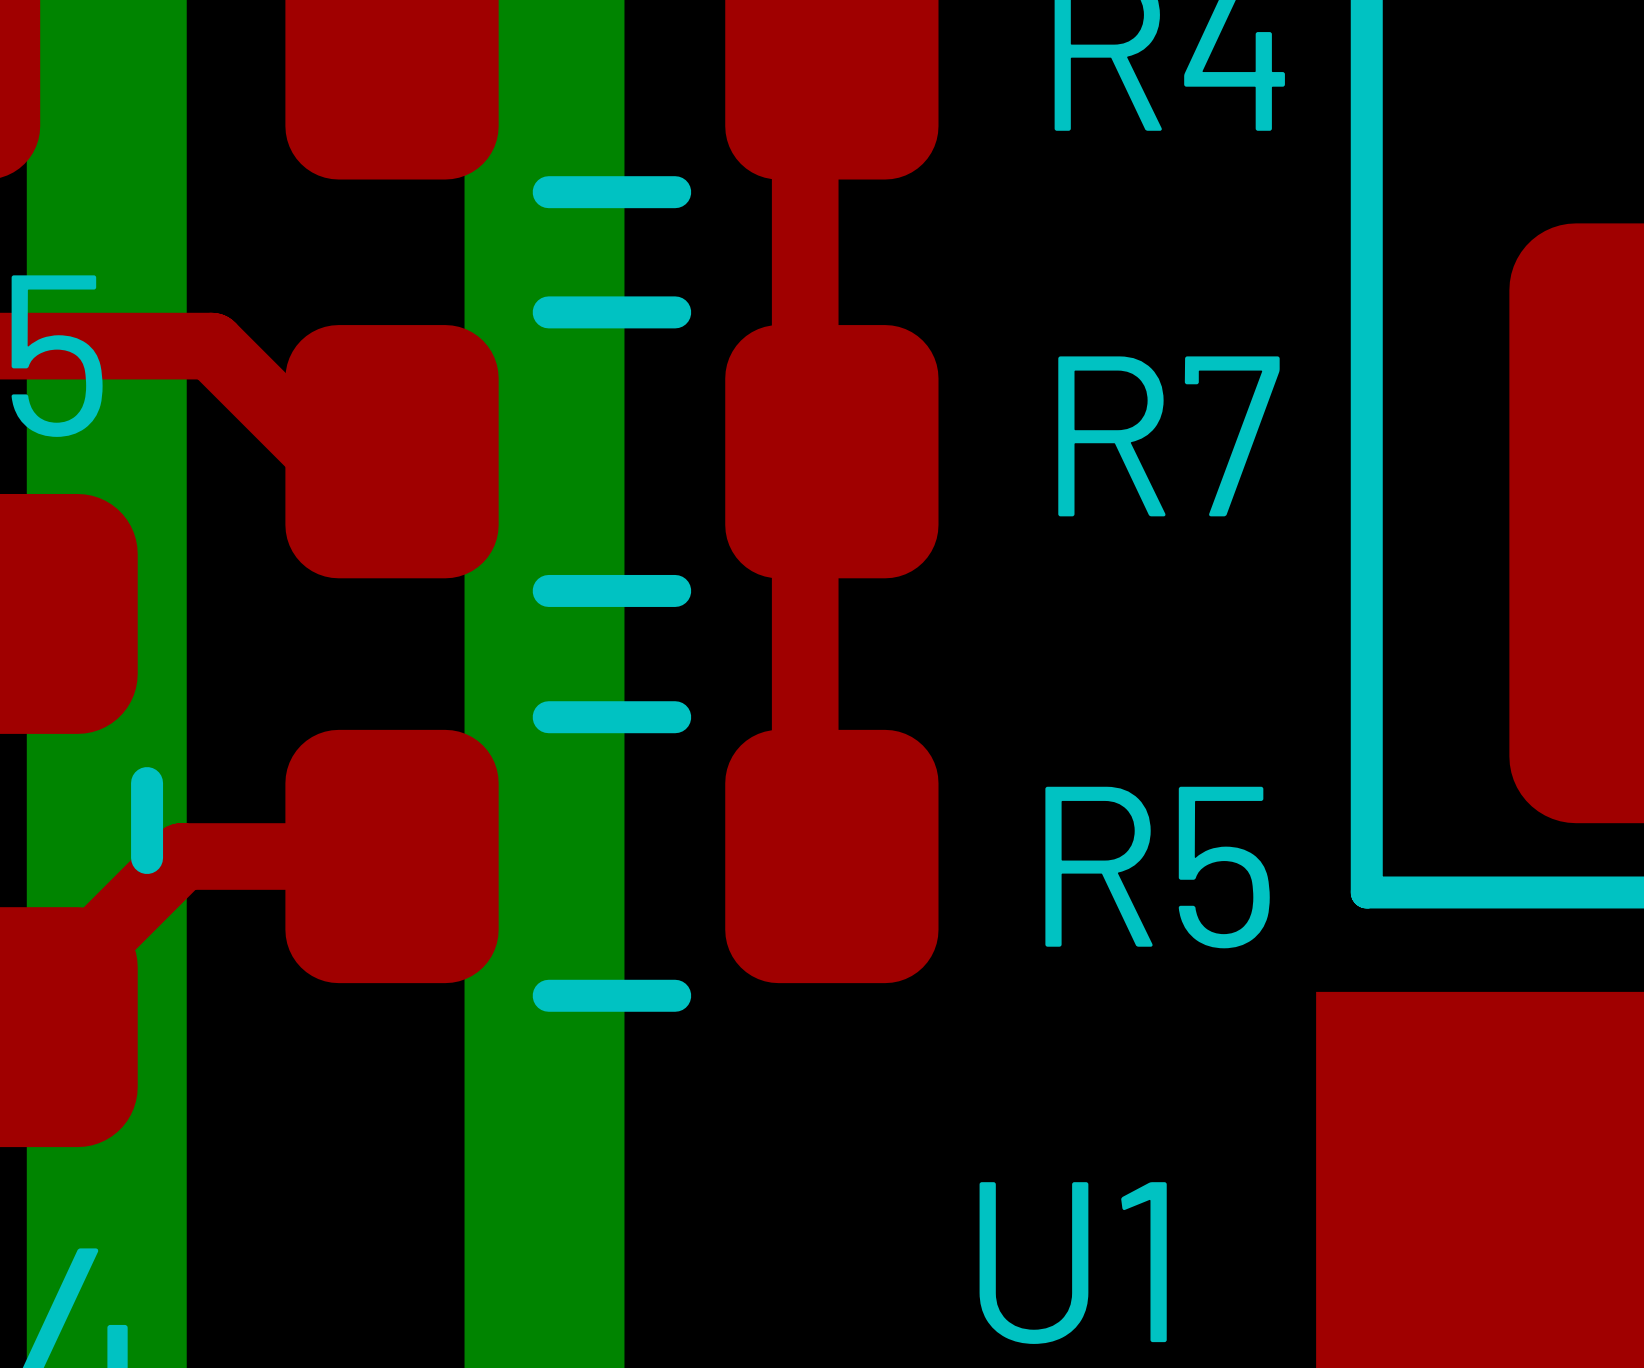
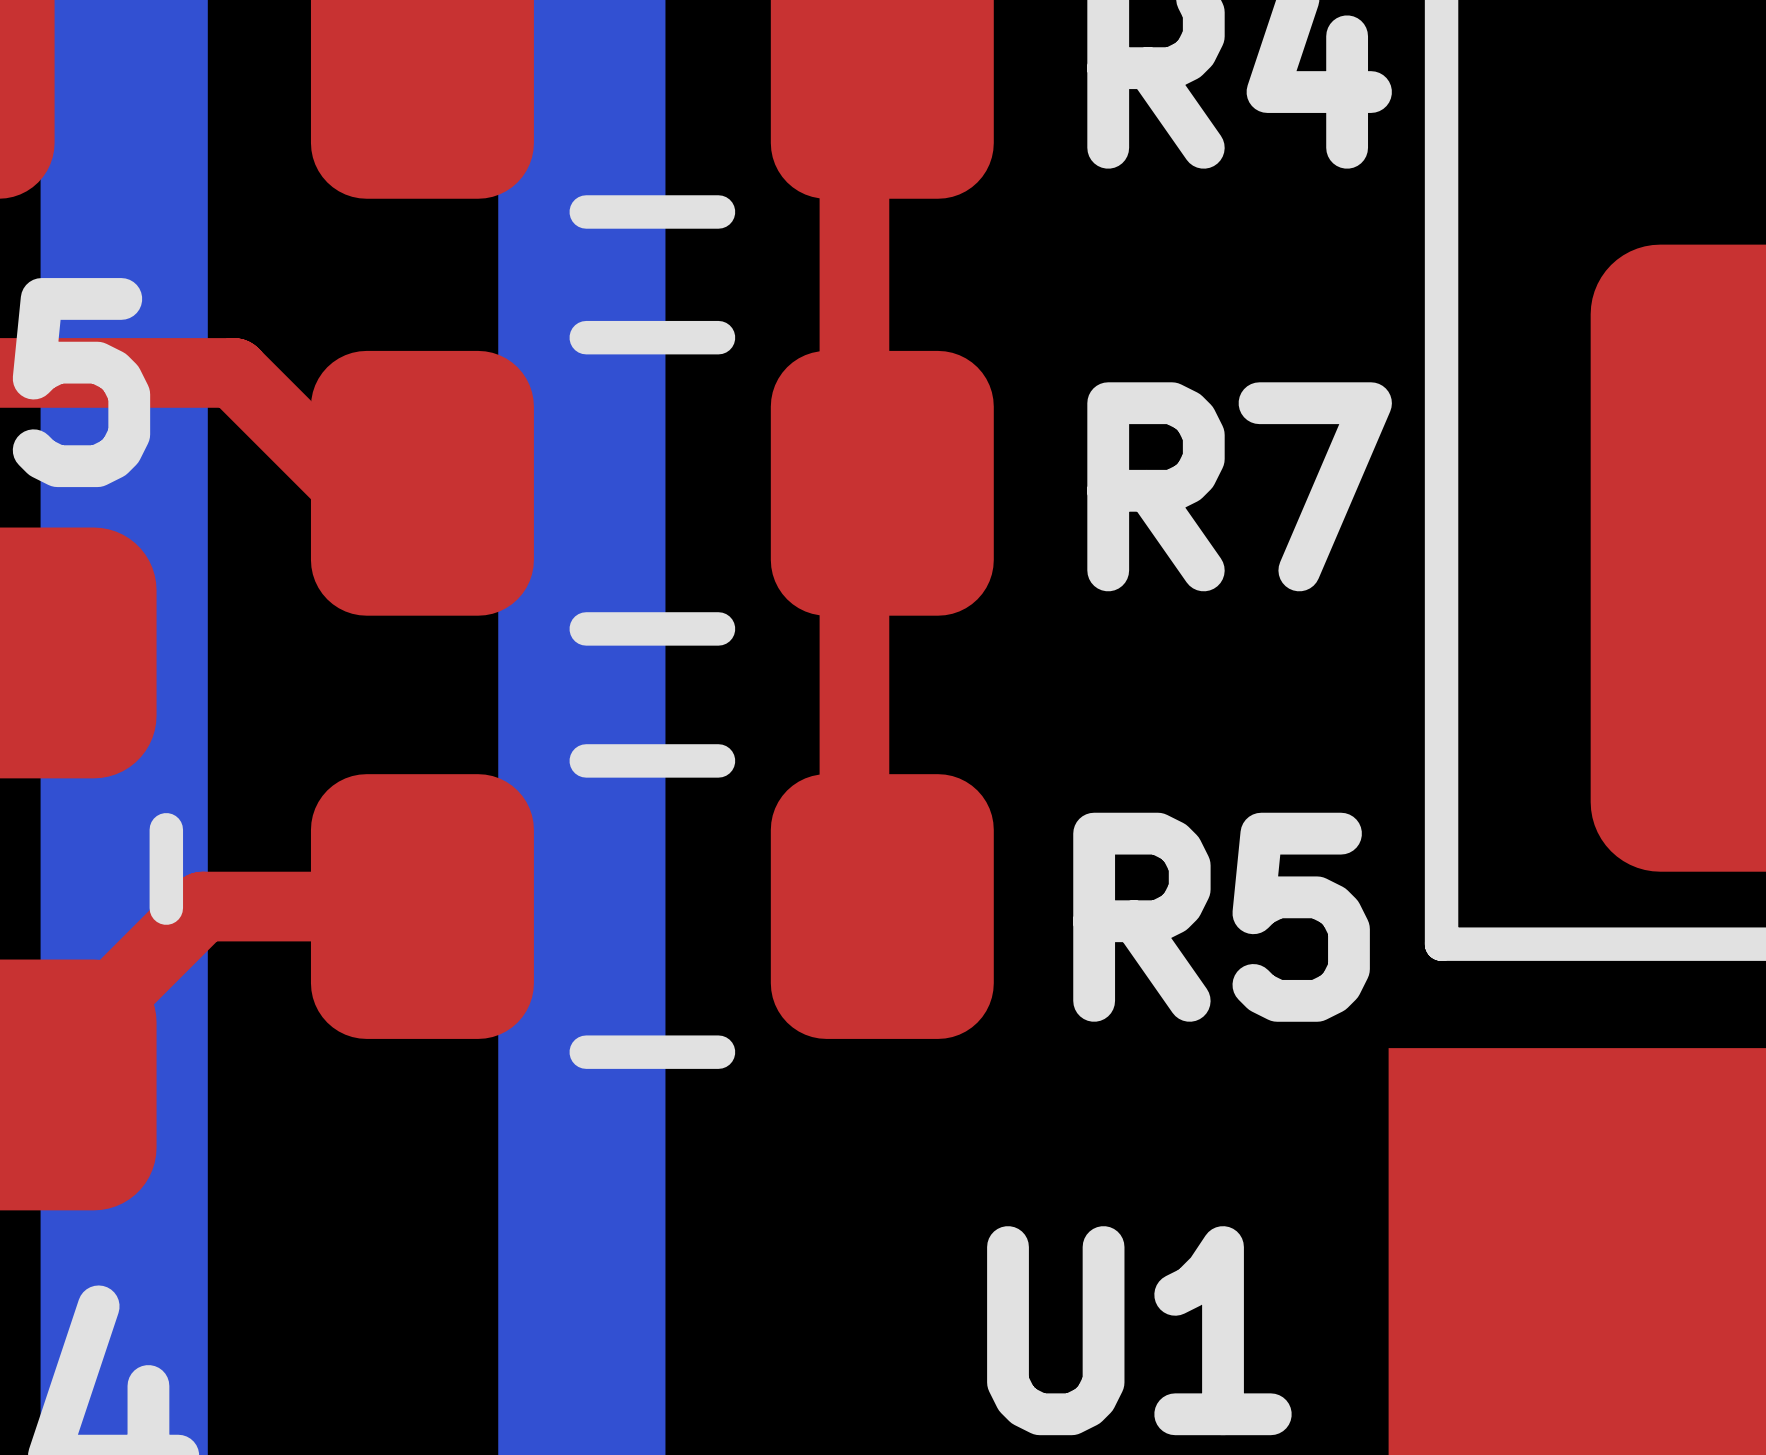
R7 name position: R7 (1168, 436) -> R7 (1239, 486)

